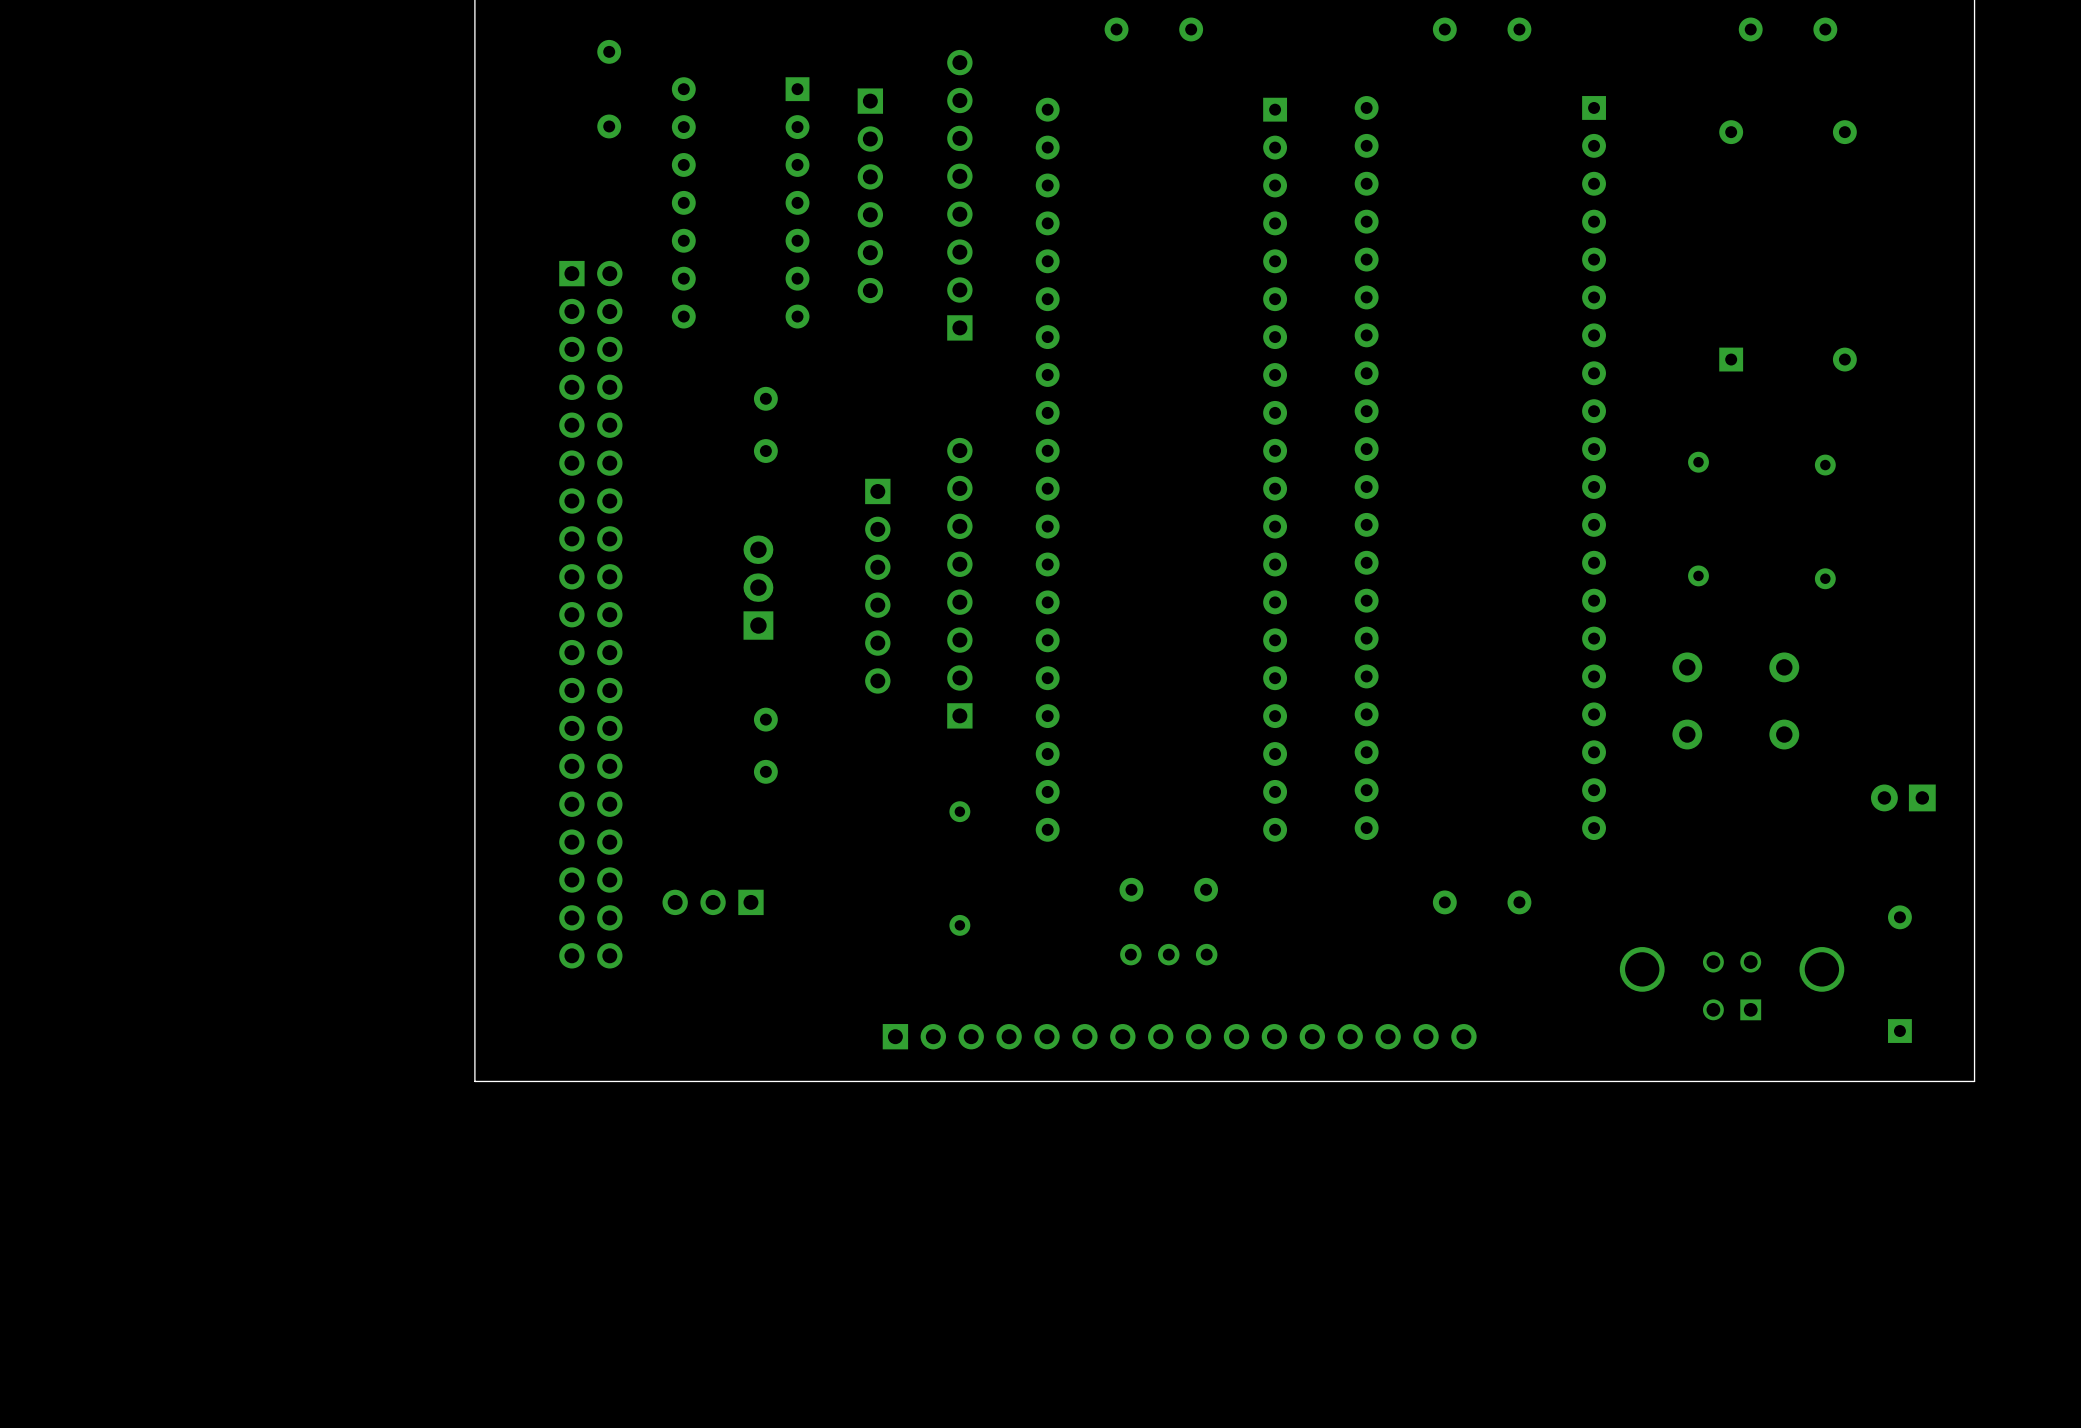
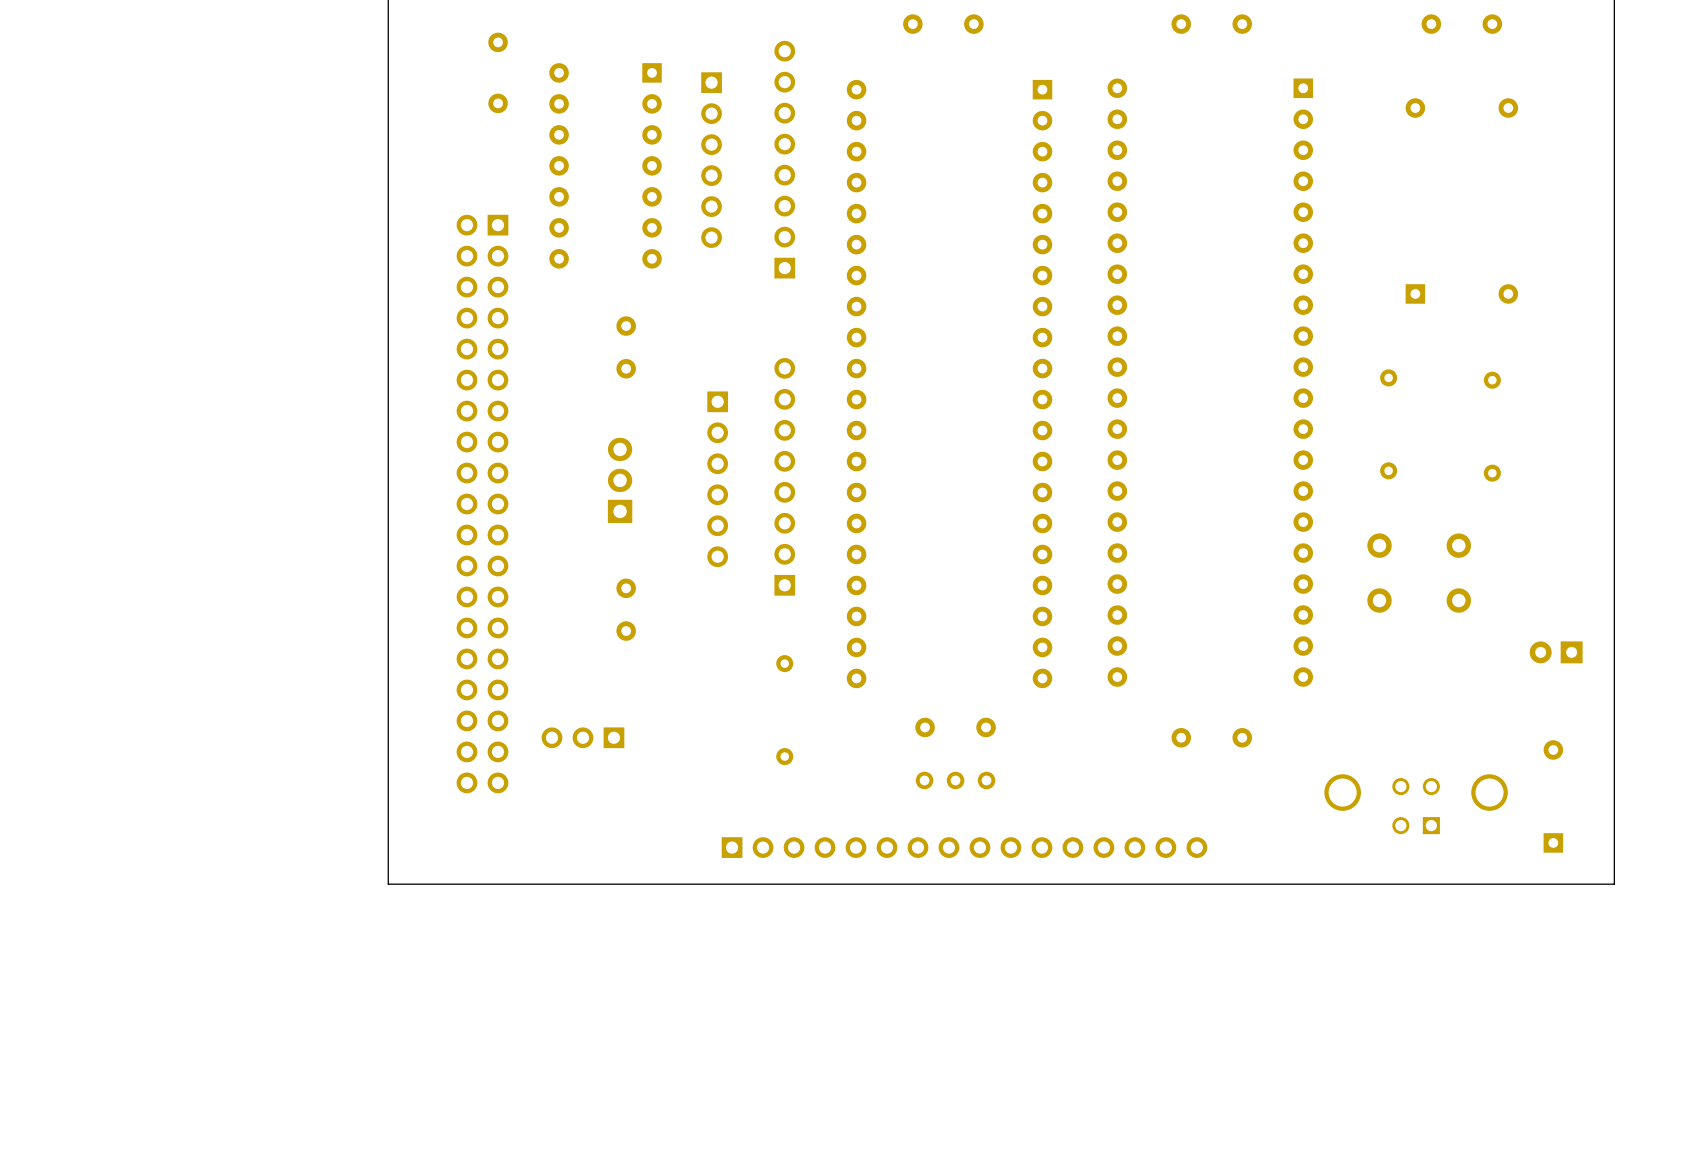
part footprint: [559, 260, 623, 969] -> [456, 214, 509, 794]

